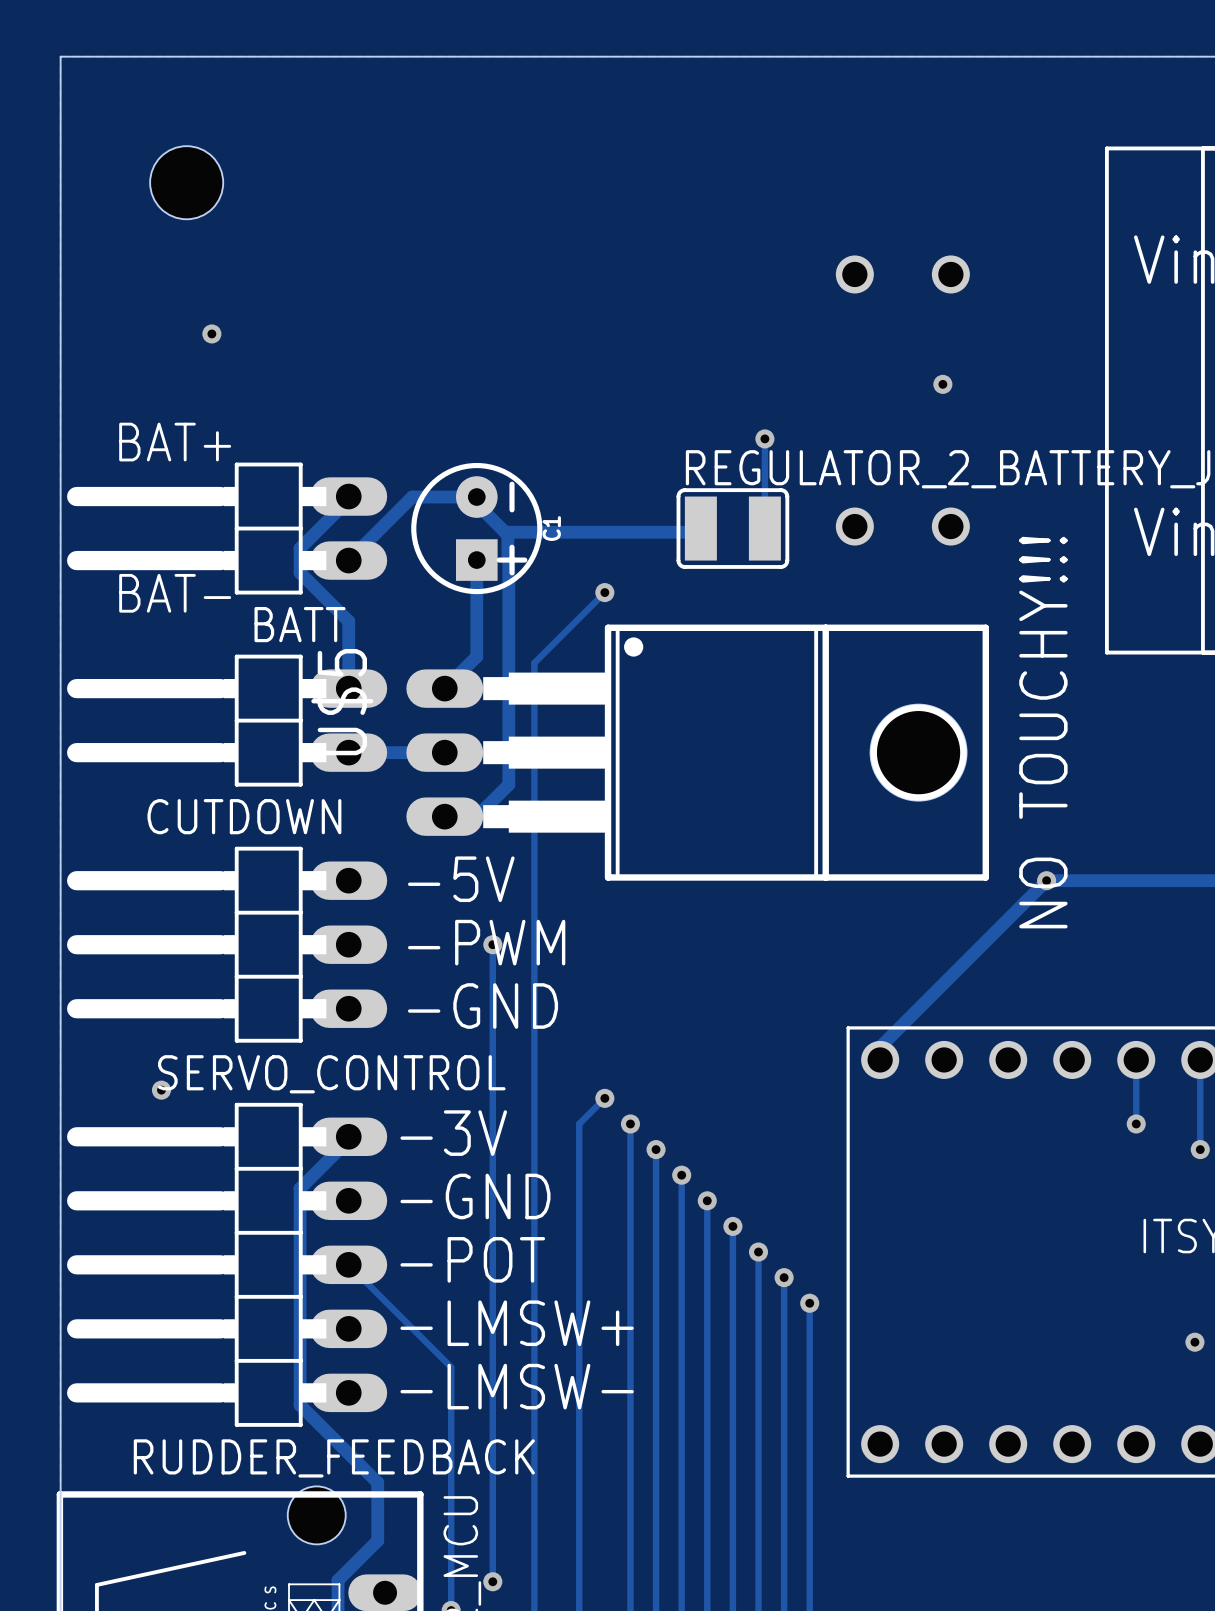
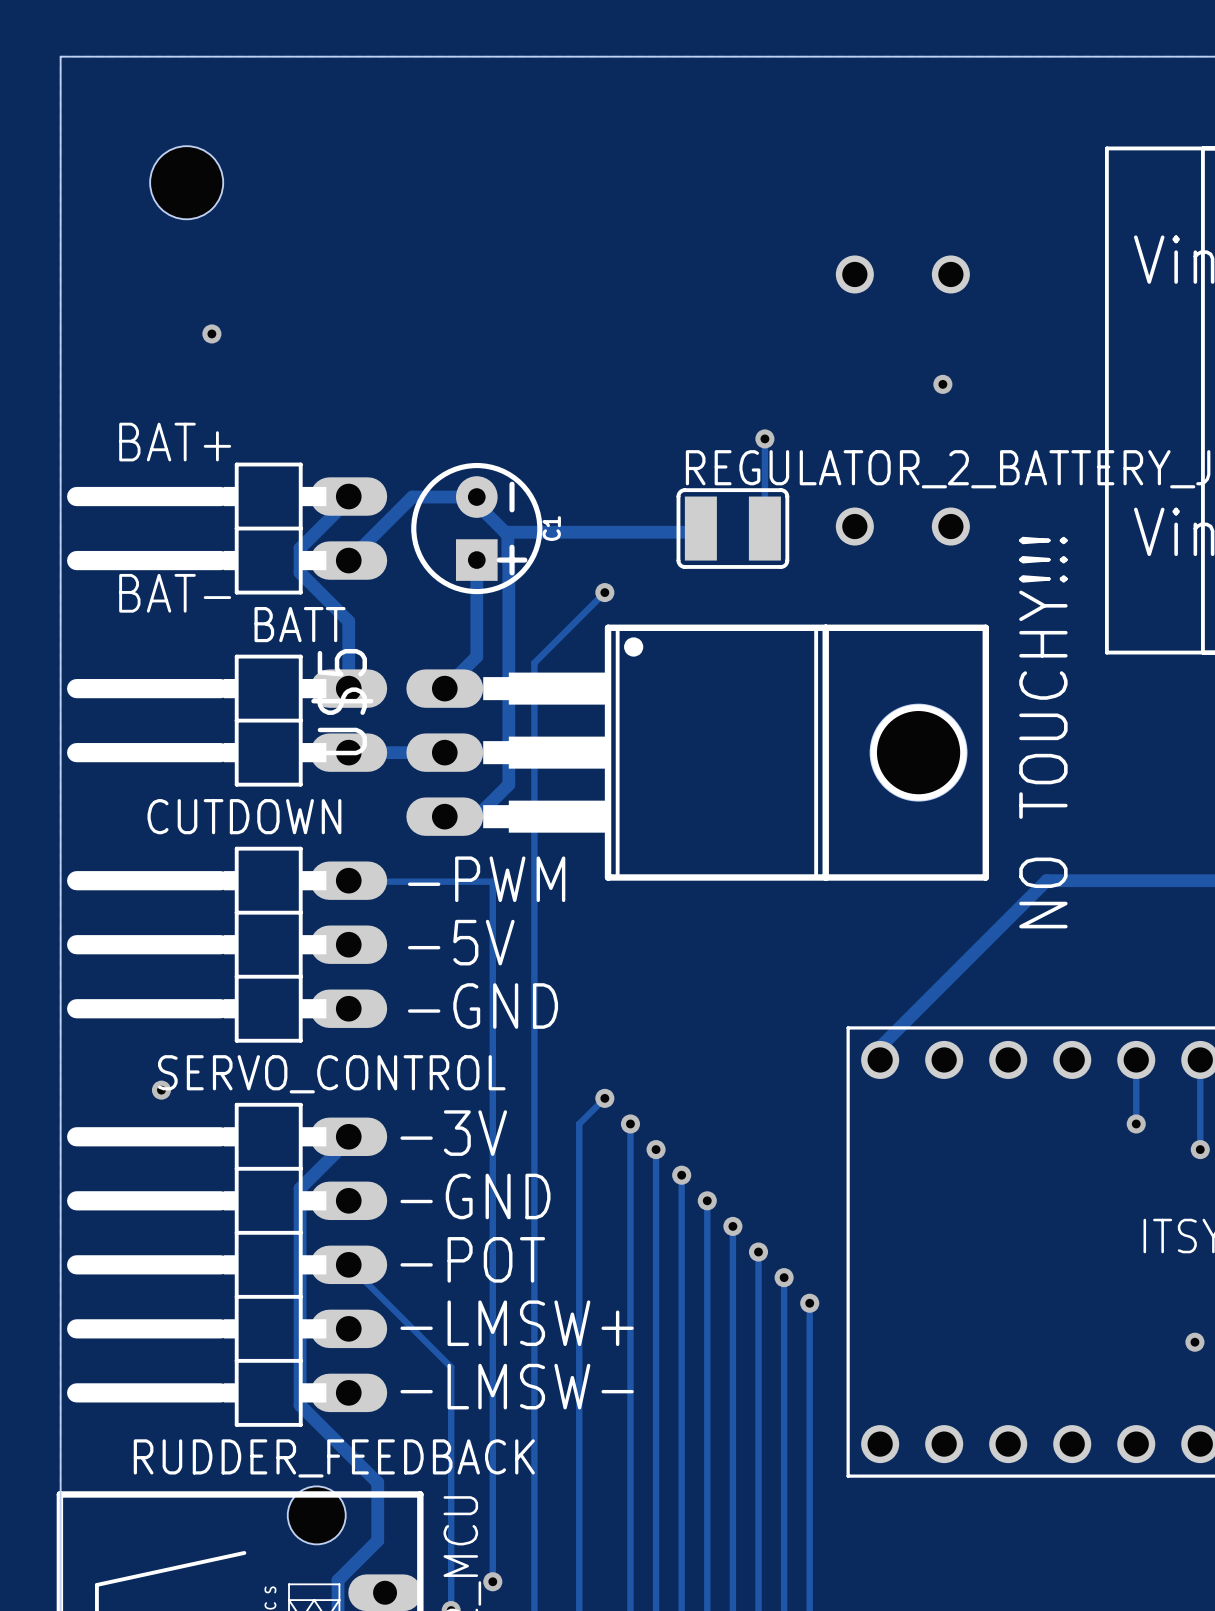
text: -5V (461, 879) -> -PWM (486, 879)
track: none -> (348, 880) (492, 881) (492, 944)
via: (1046, 880) -> none
text: -PWM (486, 942) -> -5V (461, 942)
via: (492, 944) -> none

